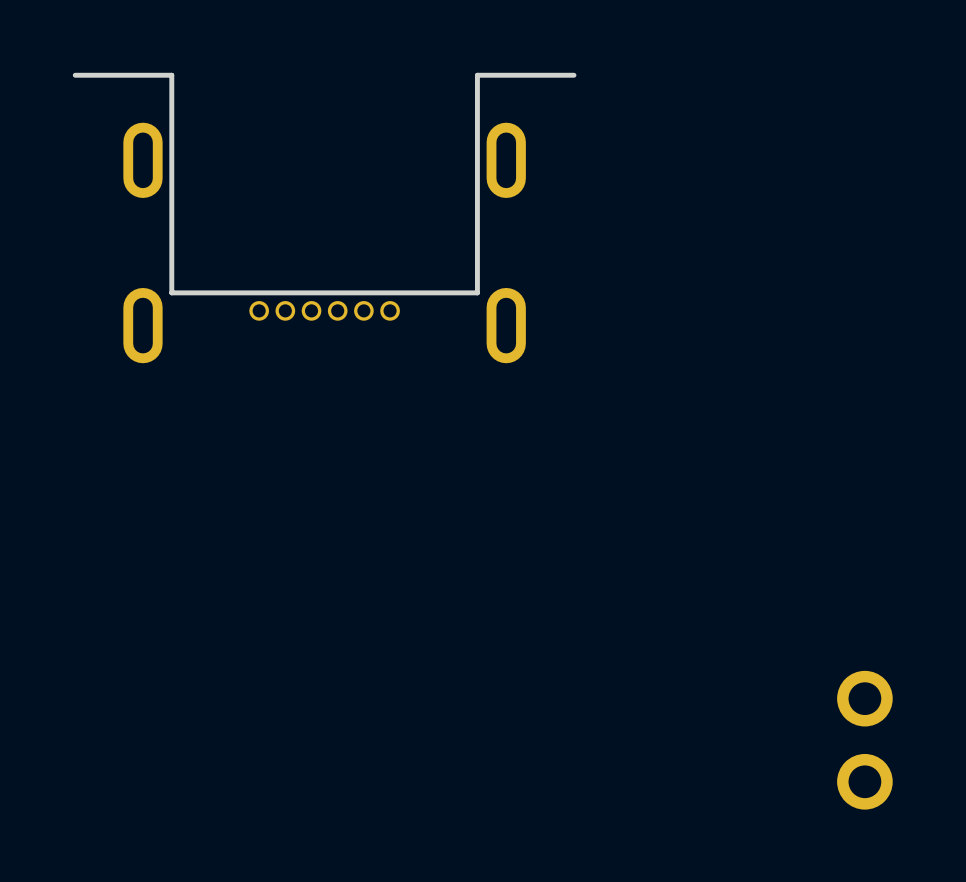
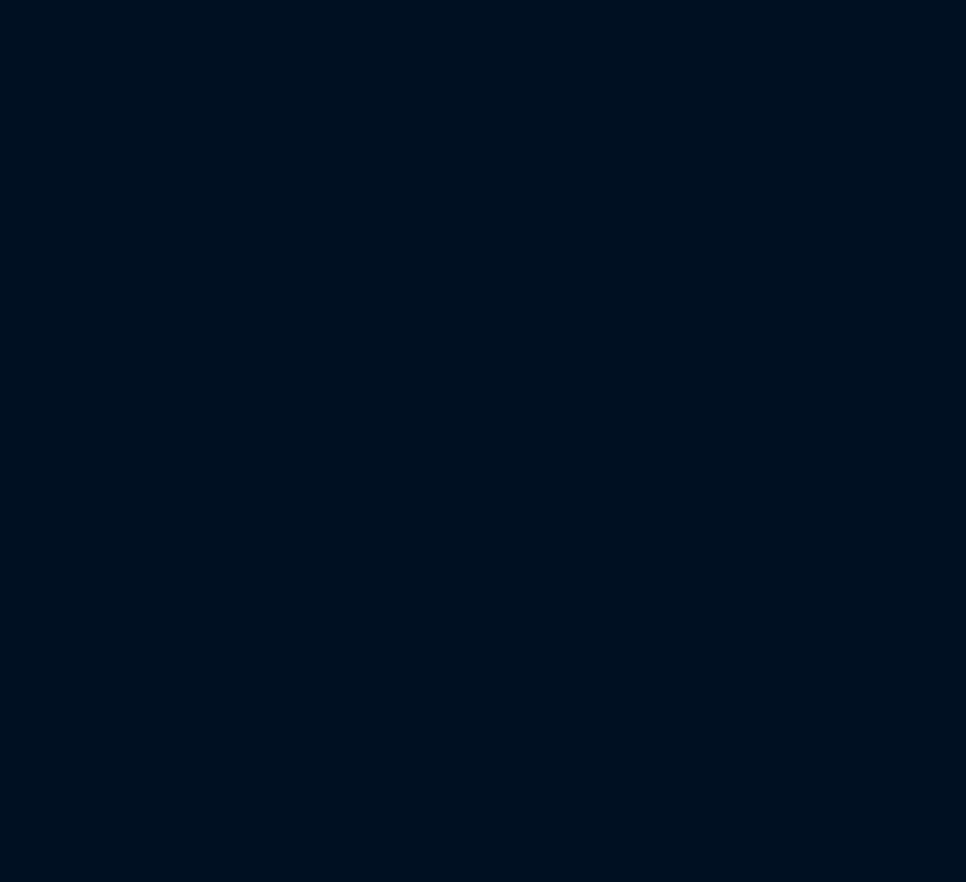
part: (324, 218) -> none
part: (864, 740) -> none

